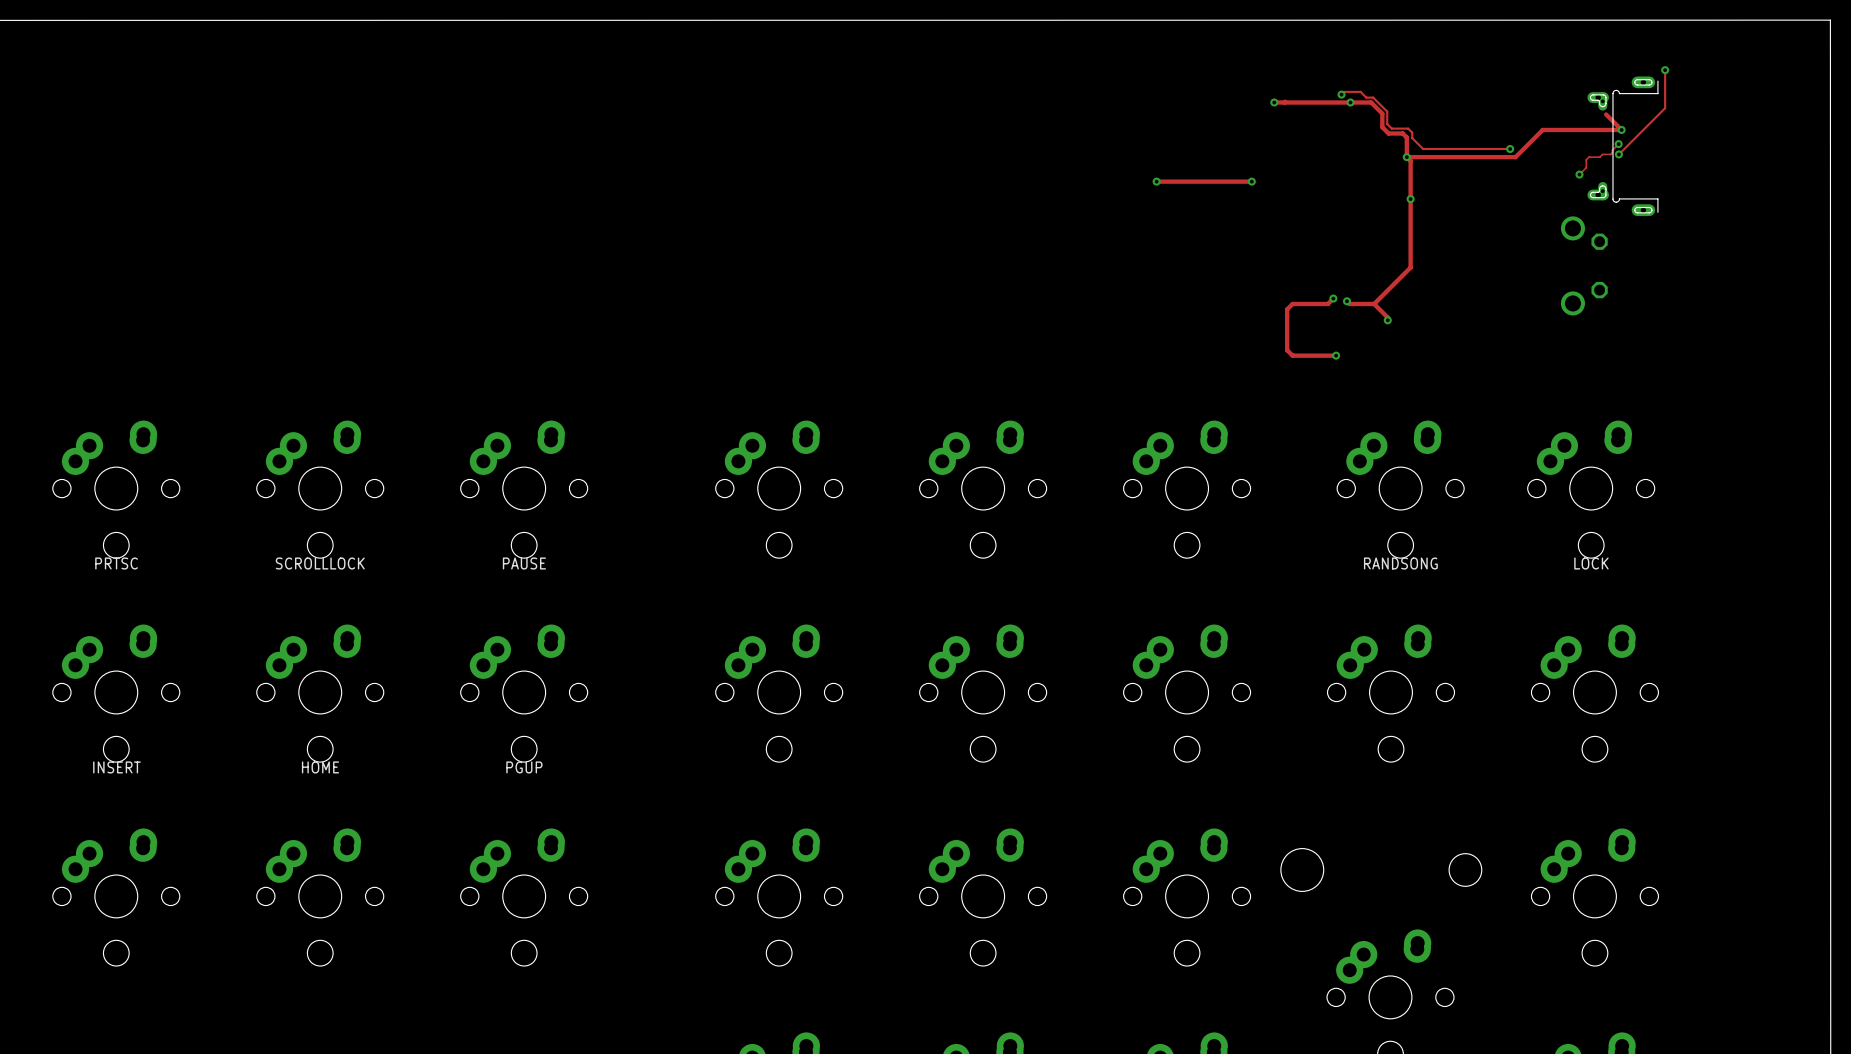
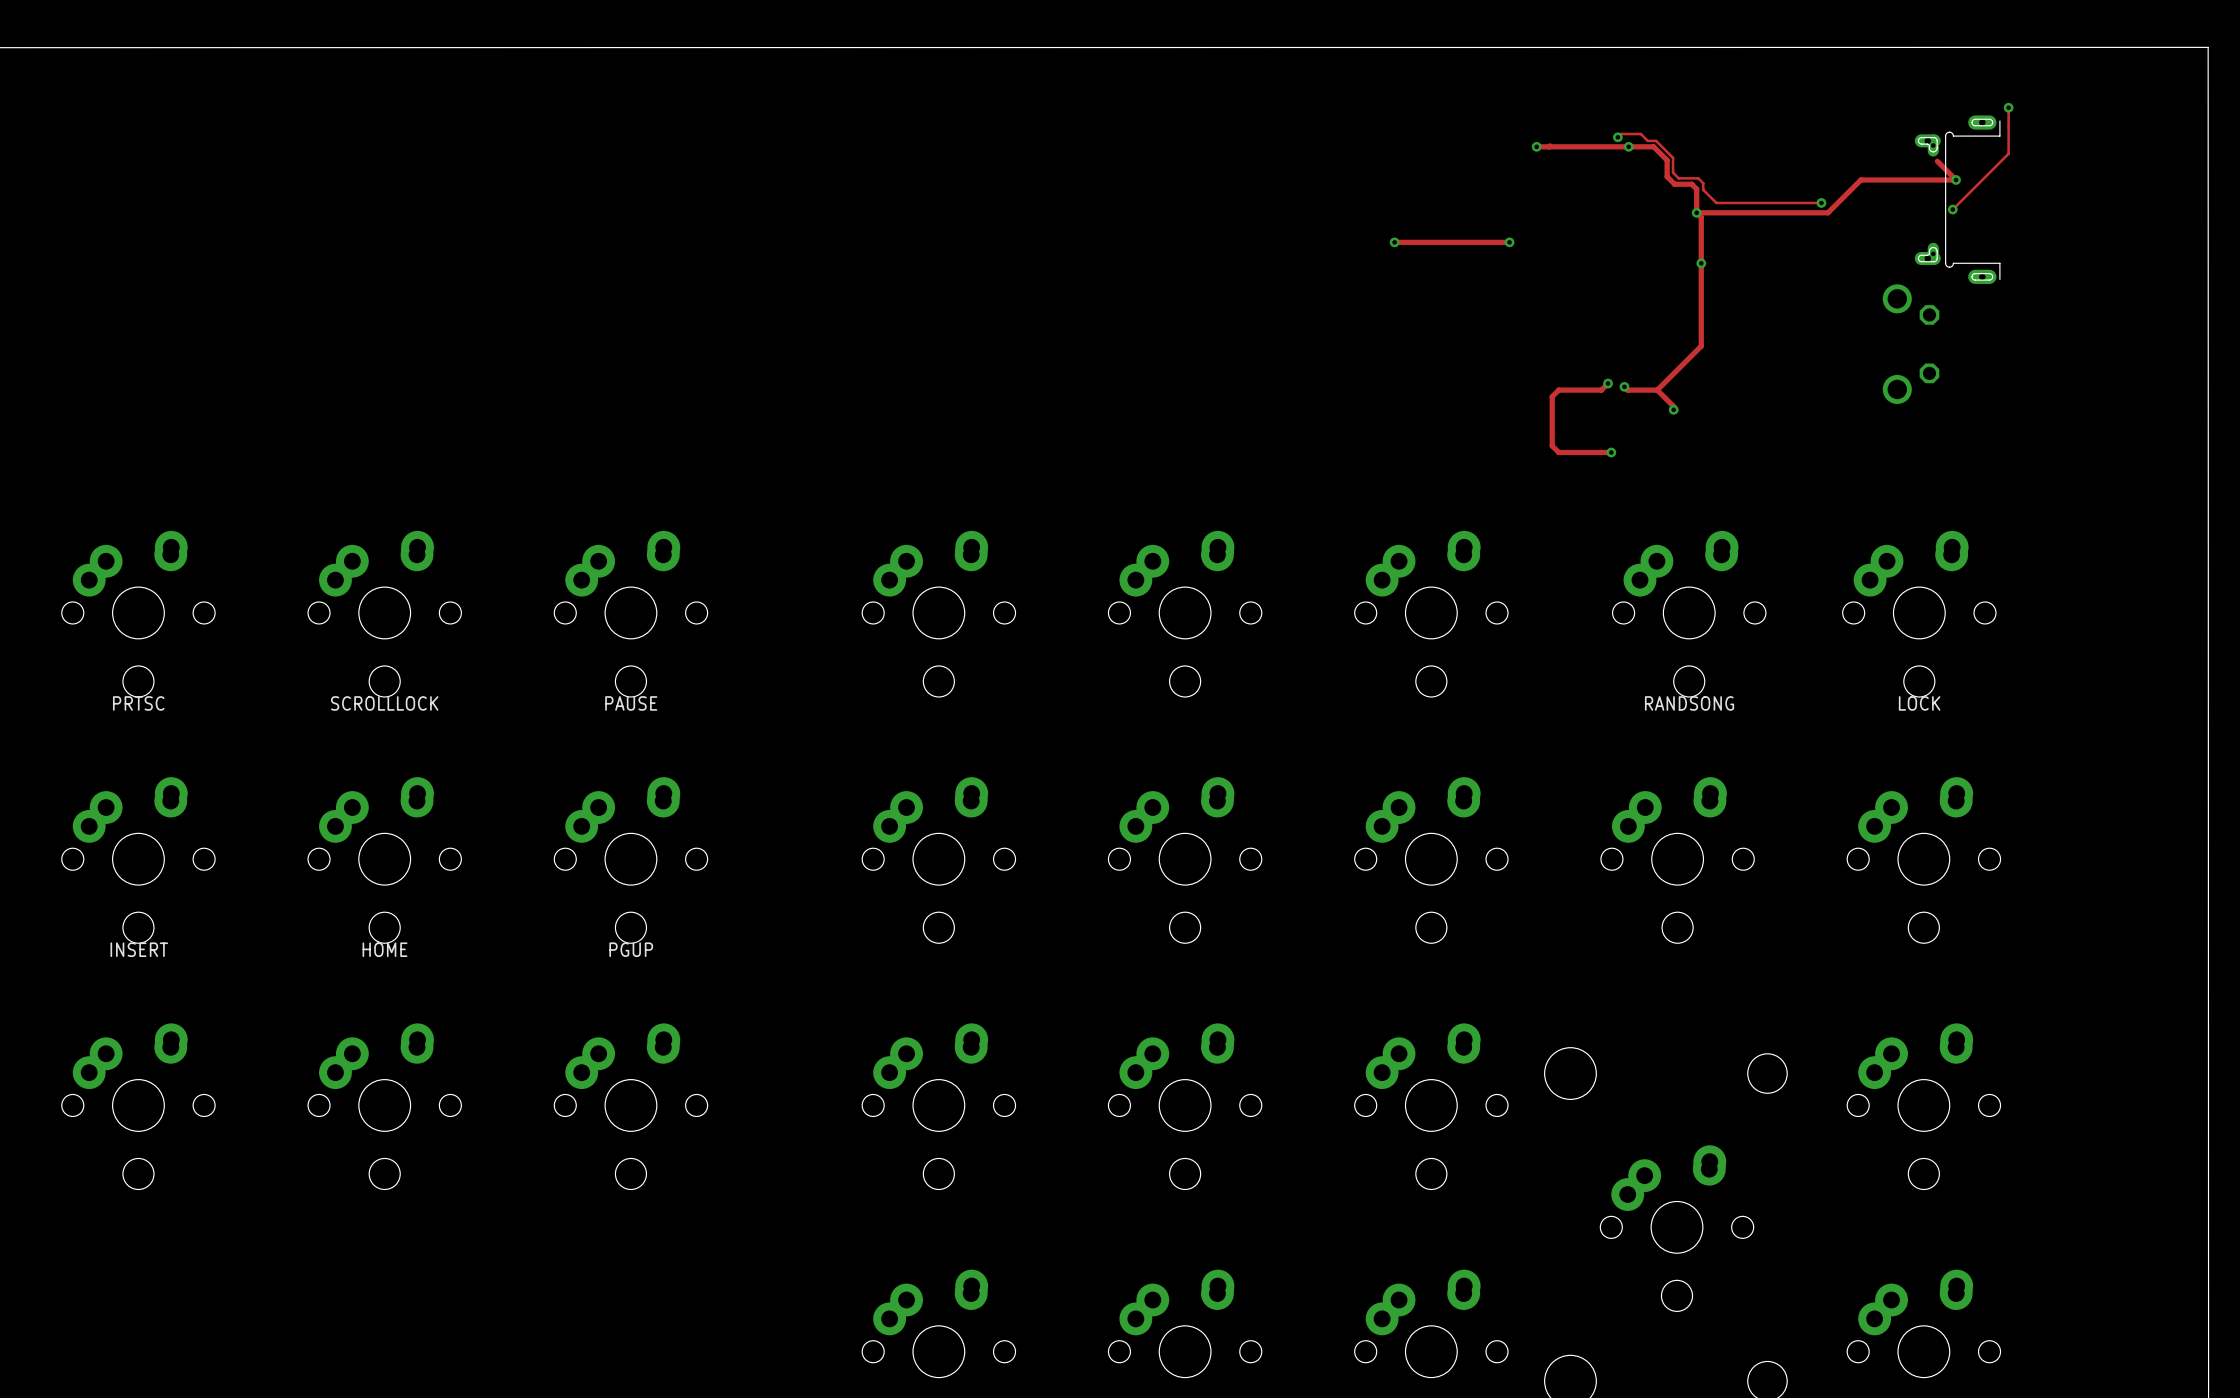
track: (1618, 144) (1610, 154) (1589, 157) (1586, 159) (1586, 167) (1579, 174) -> none
via: (1618, 144) -> none
via: (1579, 174) -> none

